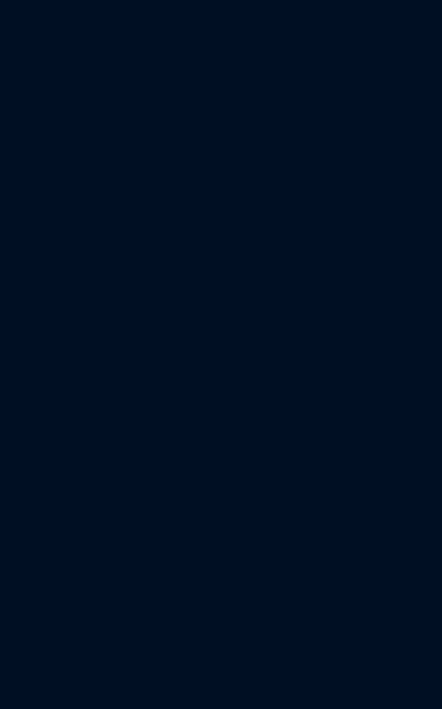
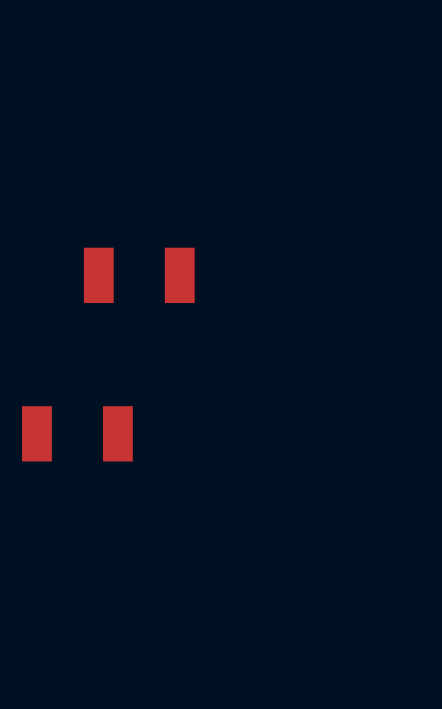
part: none -> (139, 275)
part: none -> (77, 433)

